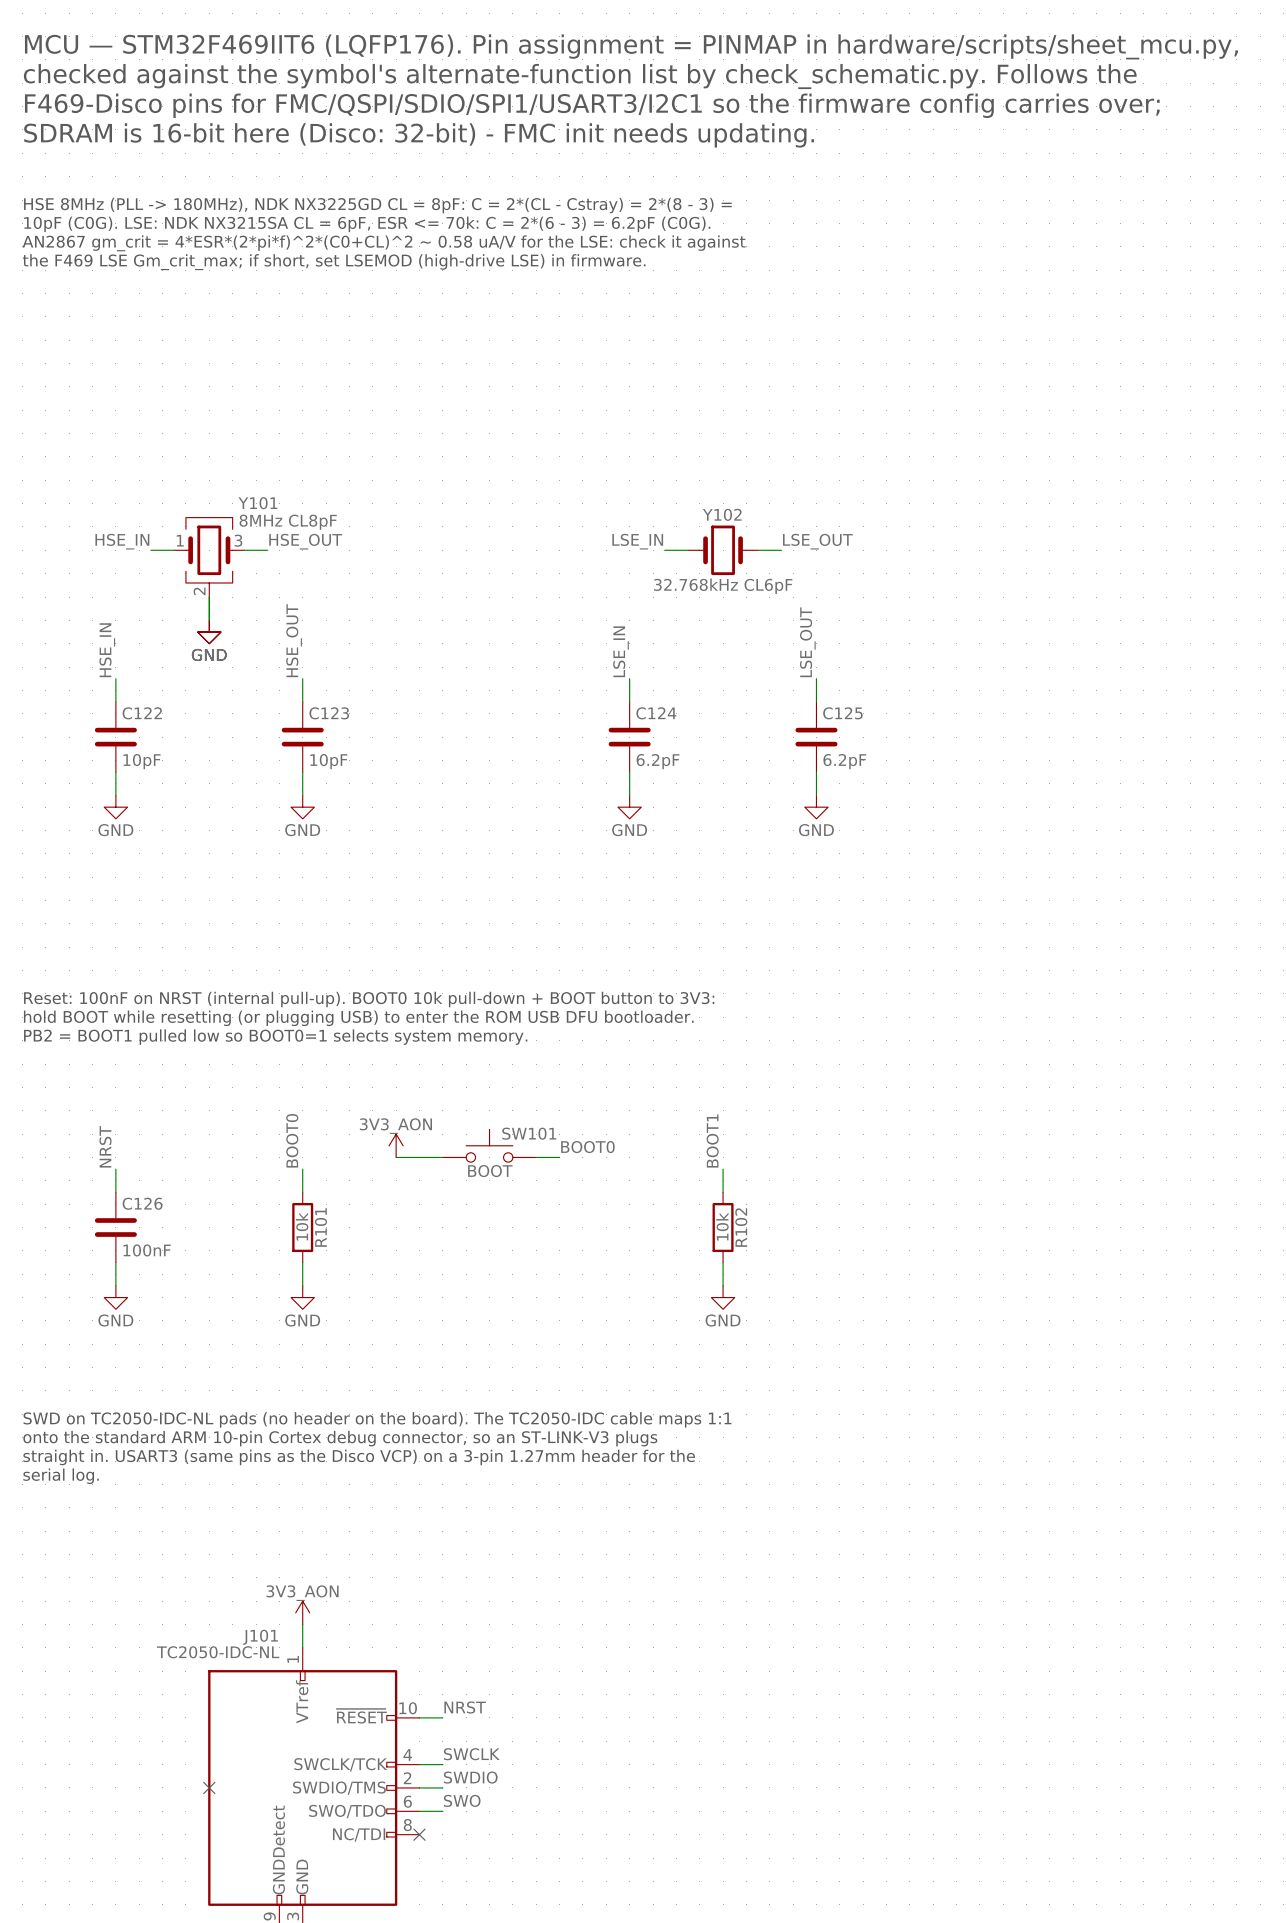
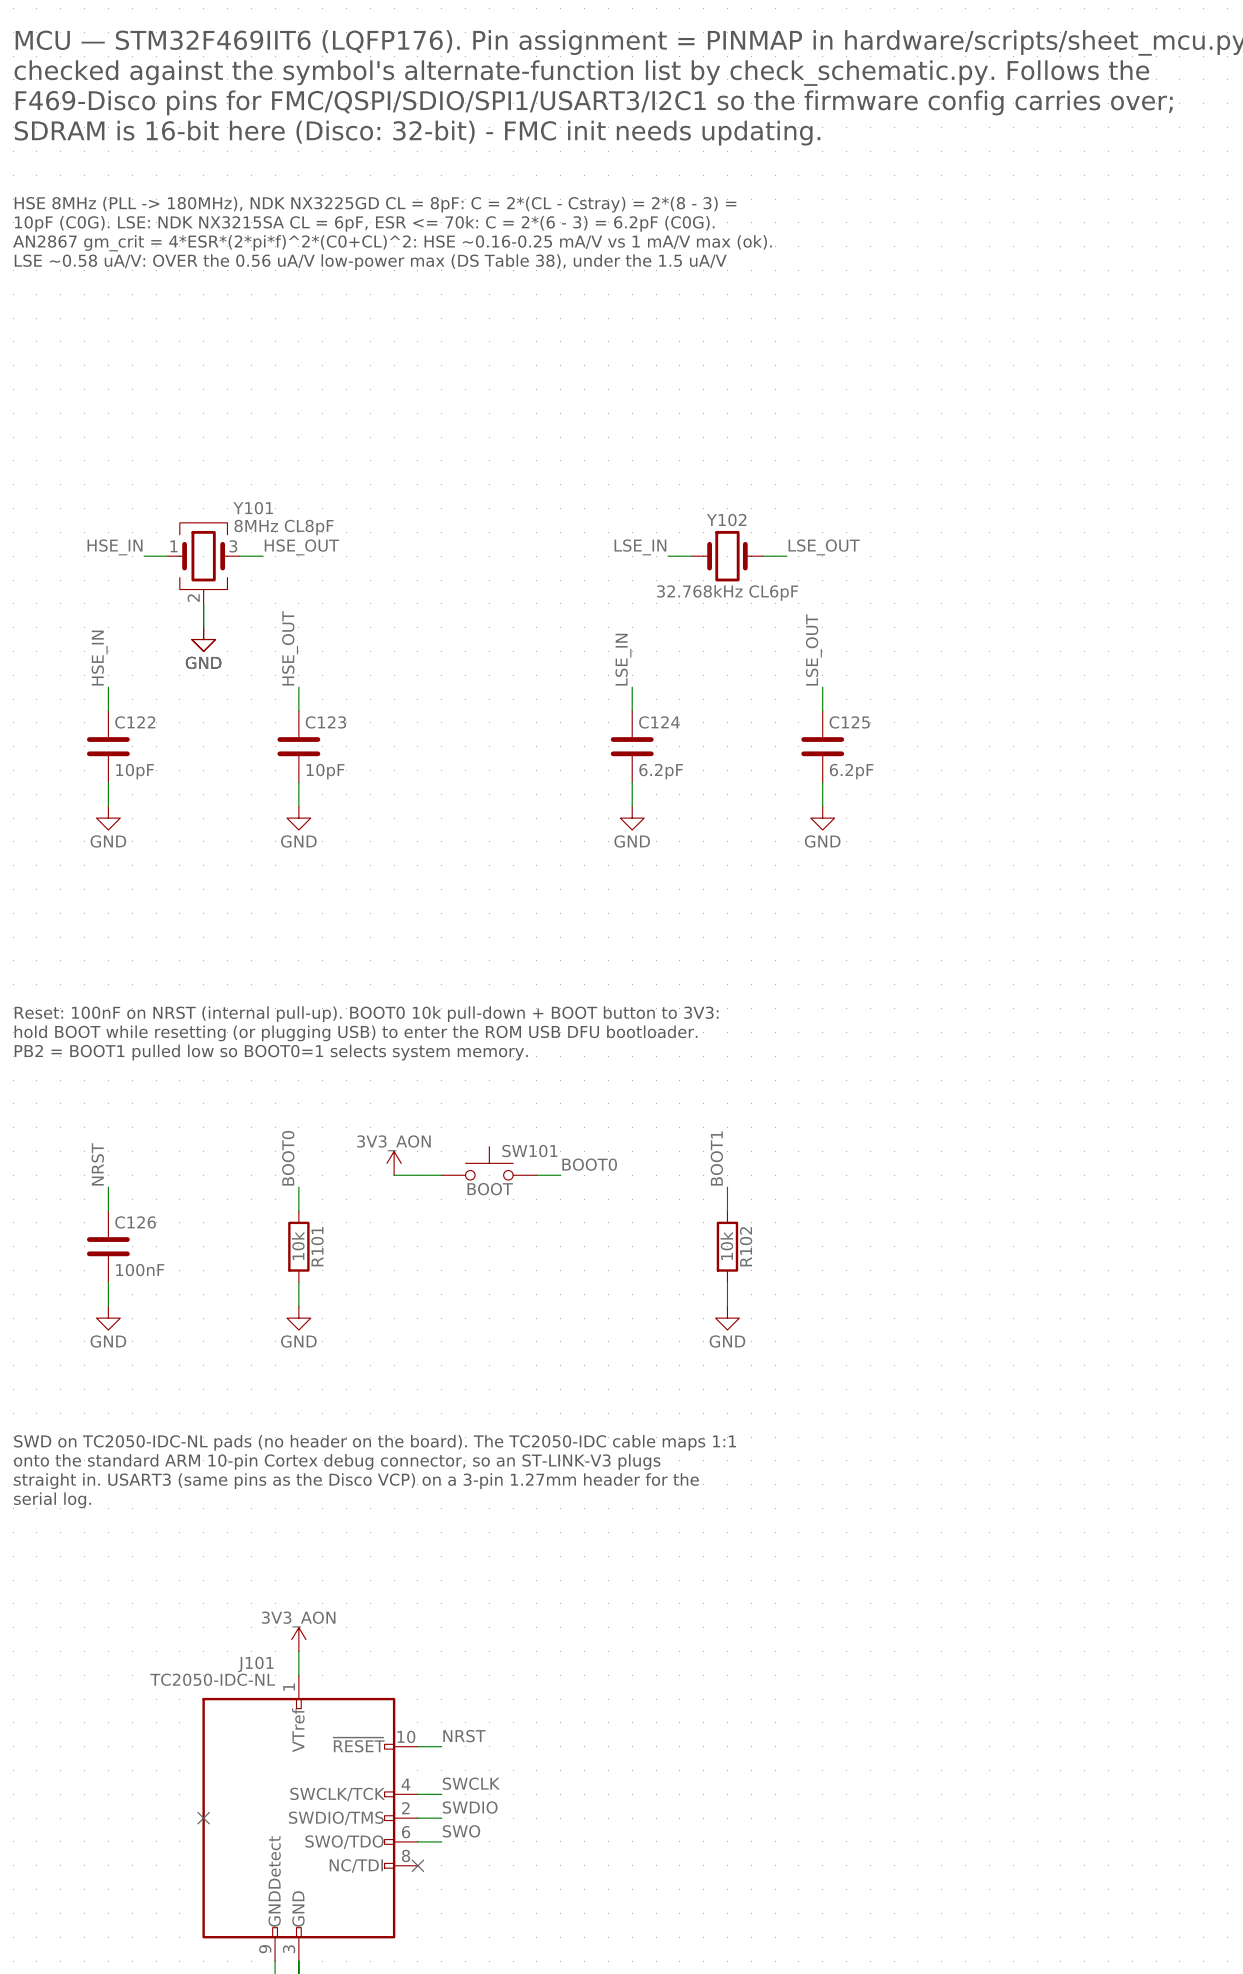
text: AN2867 gm_crit = 4*ESR*(2*pi*f)^2*(C0+CL)^2 ~ 0.58 uA/V for the LSE: check it against (384, 243) -> AN2867 gm_crit = 4*ESR*(2*pi*f)^2*(C0+CL)^2: HSE ~0.16-0.25 mA/V vs 1 mA/V max (ok). (392, 243)
text: the F469 LSE Gm_crit_max; if short, set LSEMOD (high-drive LSE) in firmware. (334, 262) -> LSE ~0.58 uA/V: OVER the 0.56 uA/V low-power max (DS Table 38), under the 1.5 uA/V (370, 262)

